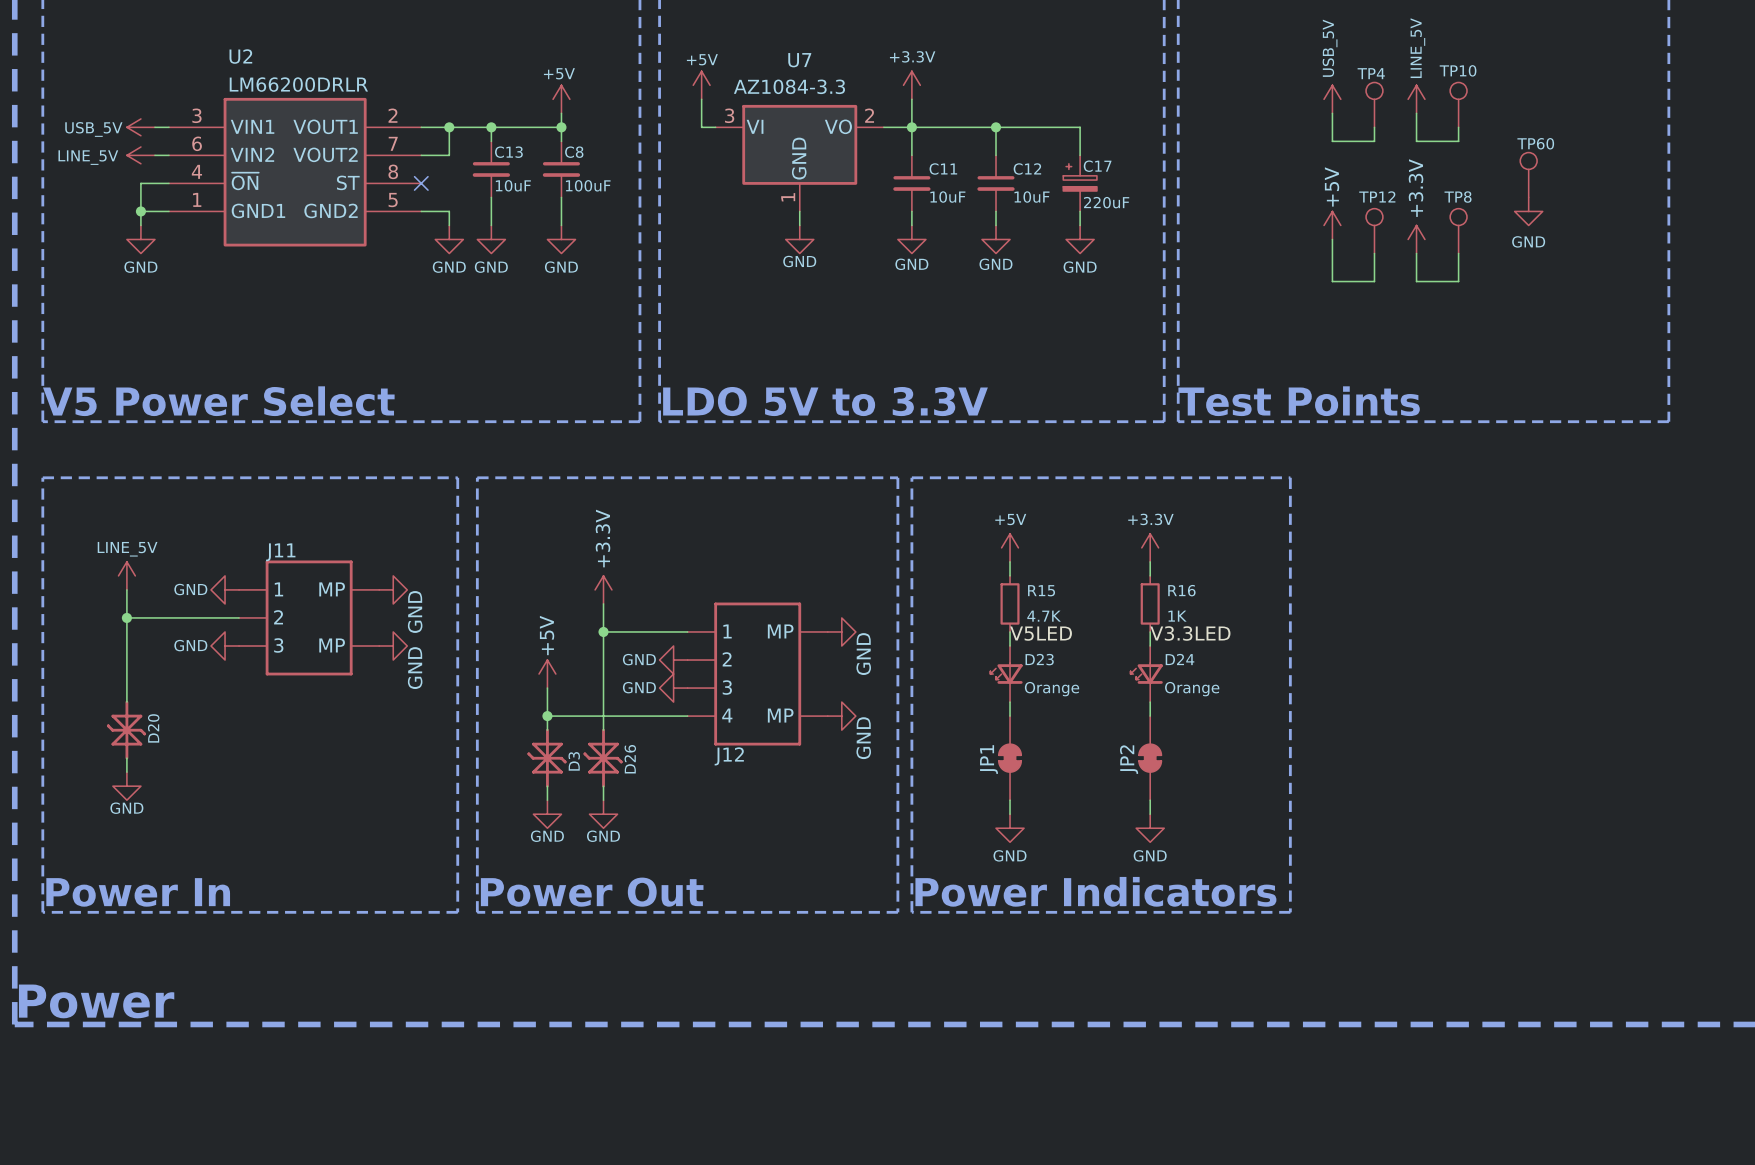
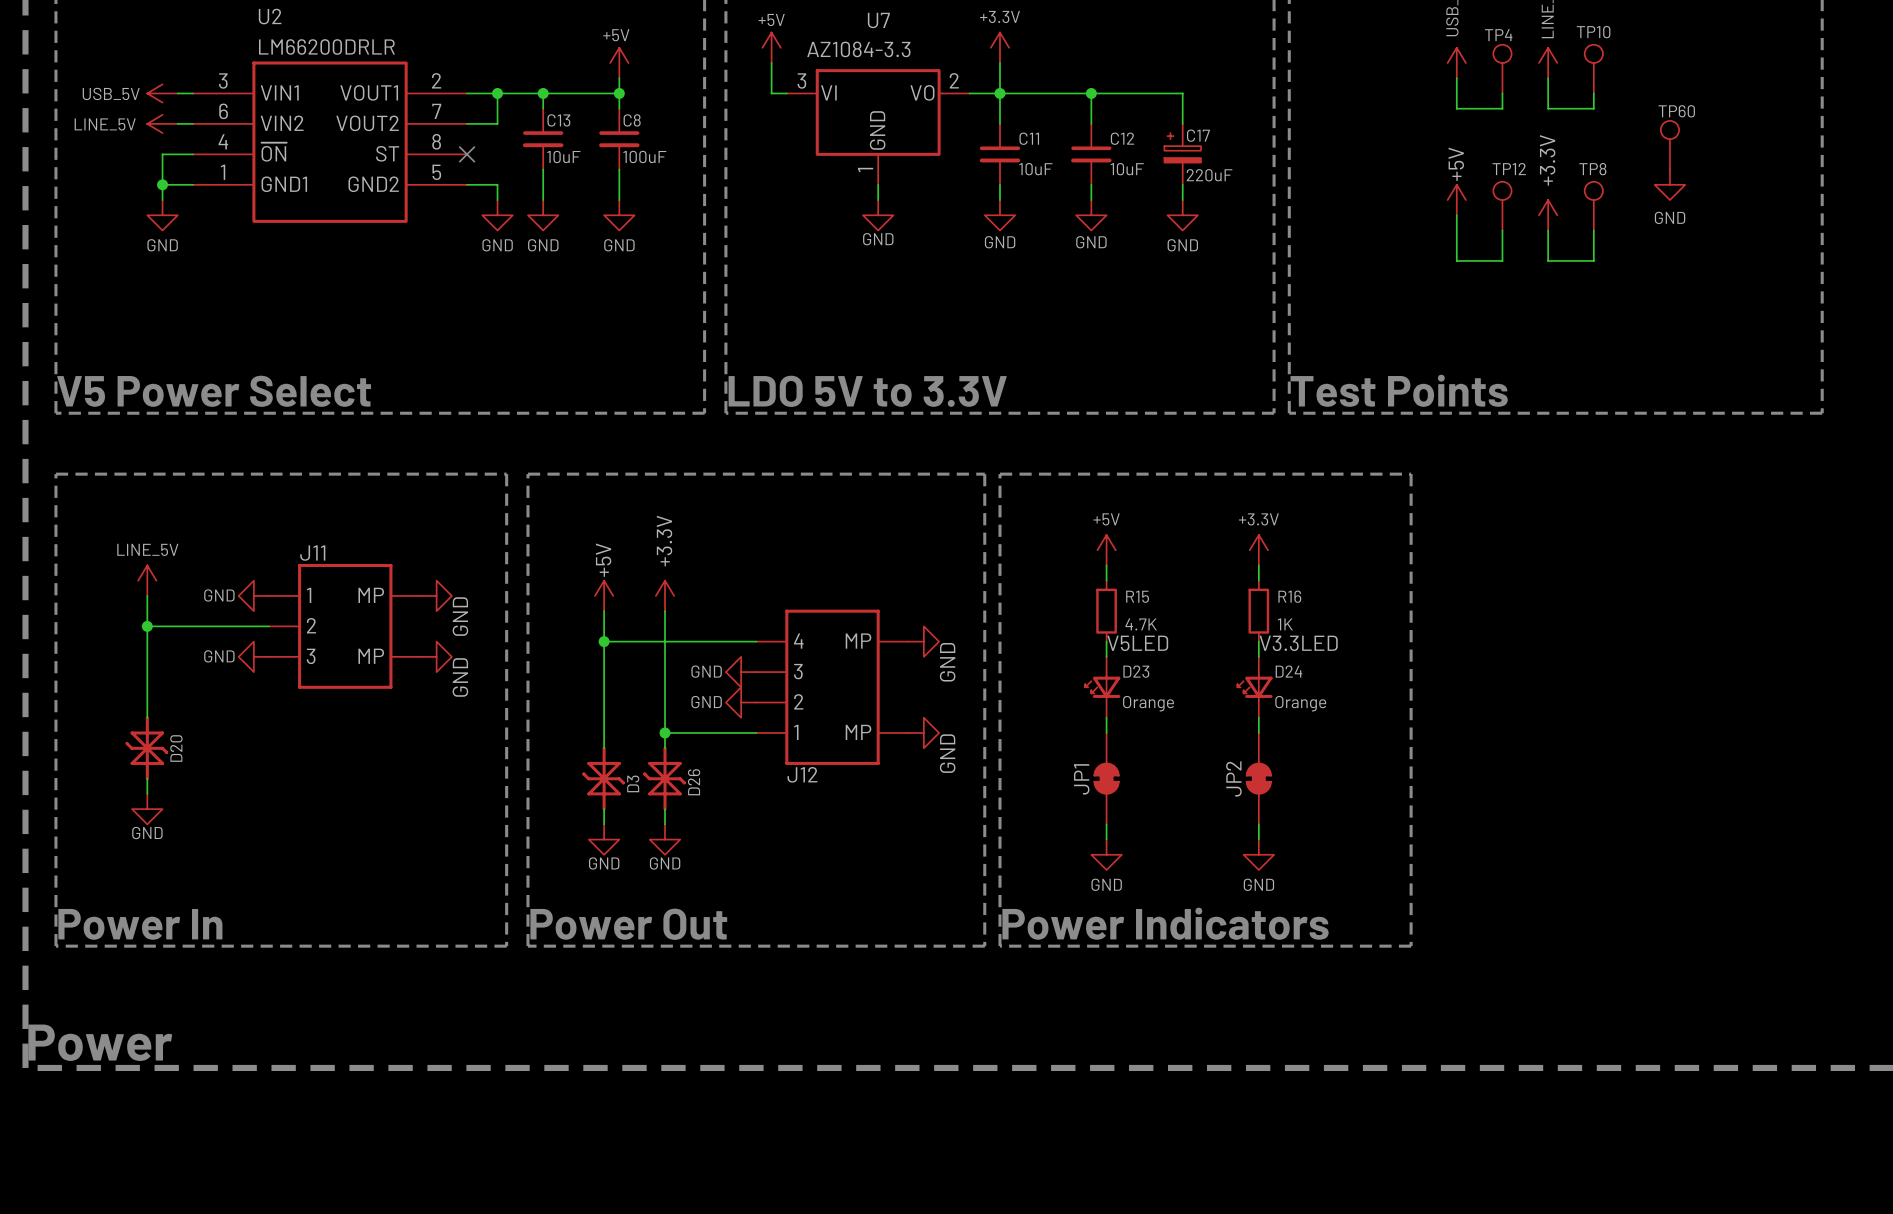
wire: none -> (604, 611) (604, 702)
junction: none -> (604, 641)
junction: (603, 631) -> none
power symbol position: +5V (547, 674) -> +5V (604, 595)
J12 flip: as is (757, 674) -> up-down (832, 687)
wire: (547, 716) (603, 716) -> (604, 641) (665, 641)
junction: (547, 716) -> none
junction: none -> (665, 732)

